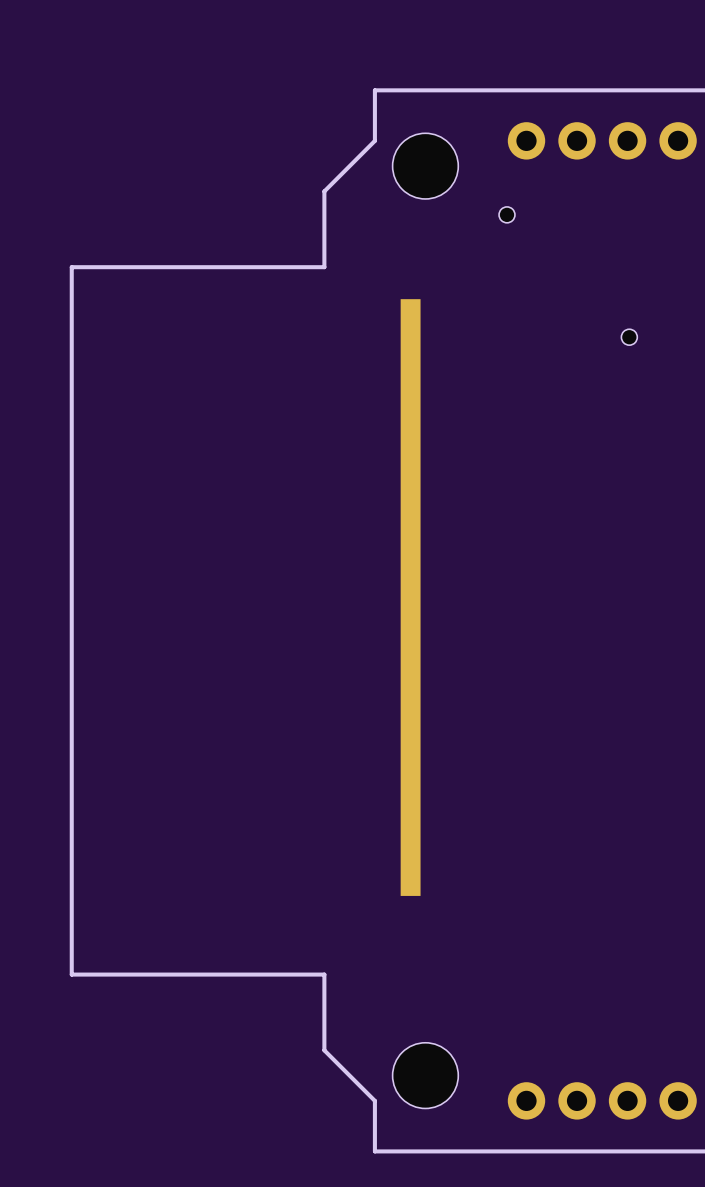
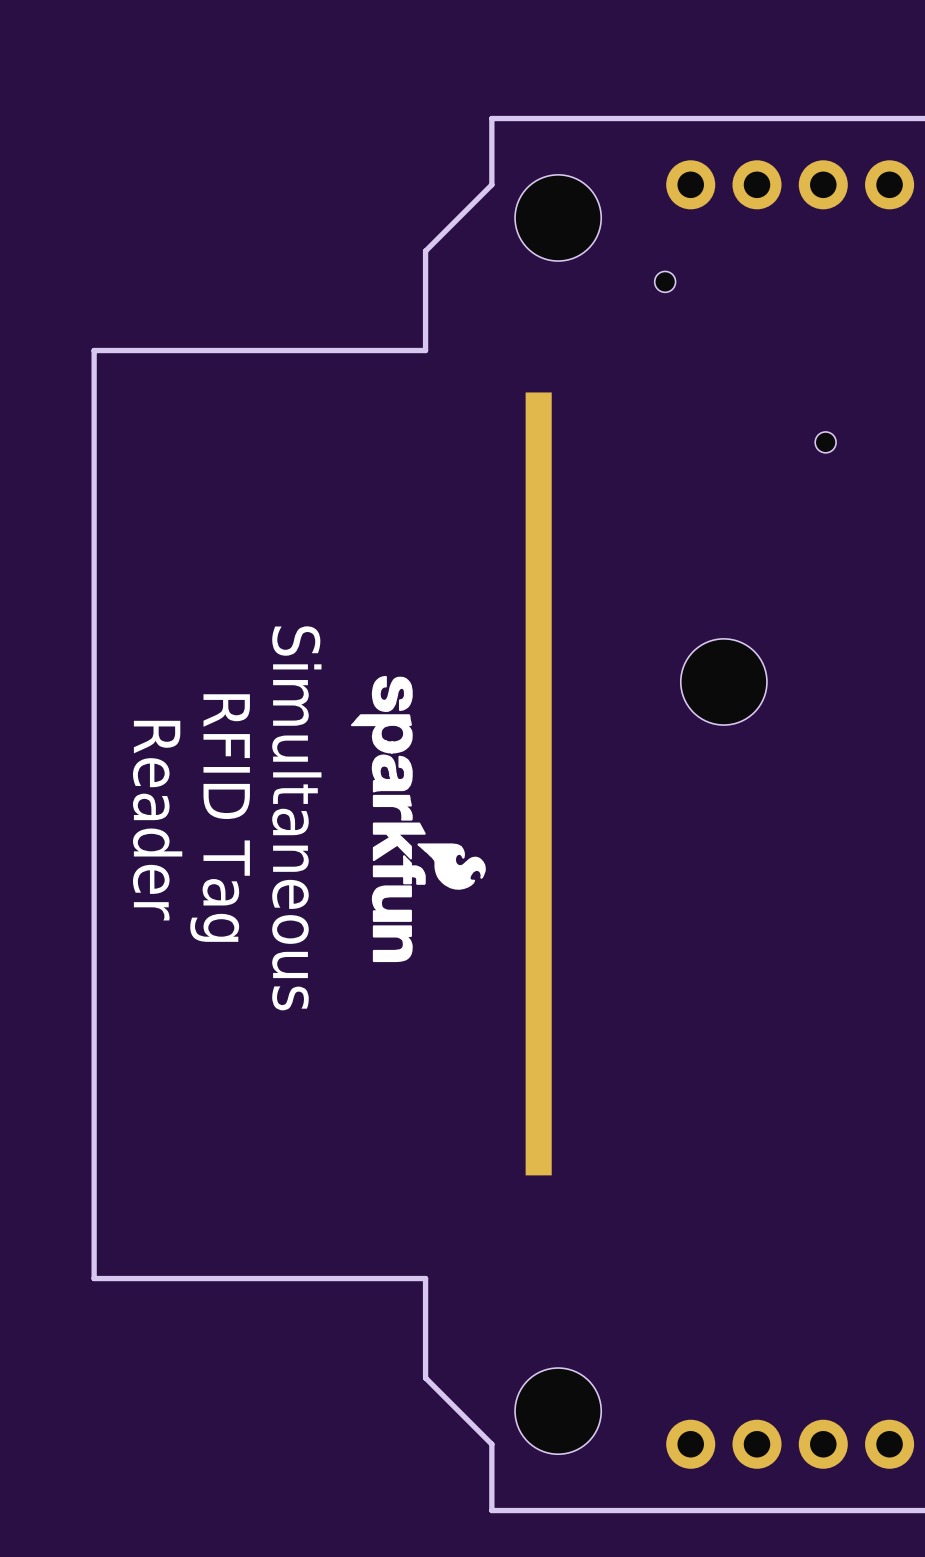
drawing: none -> [350, 675, 486, 963]
part: none -> (723, 681)
text: none -> RFID Tag (220, 818)
text: none -> Simultaneous (296, 818)
text: none -> Reader (157, 820)

